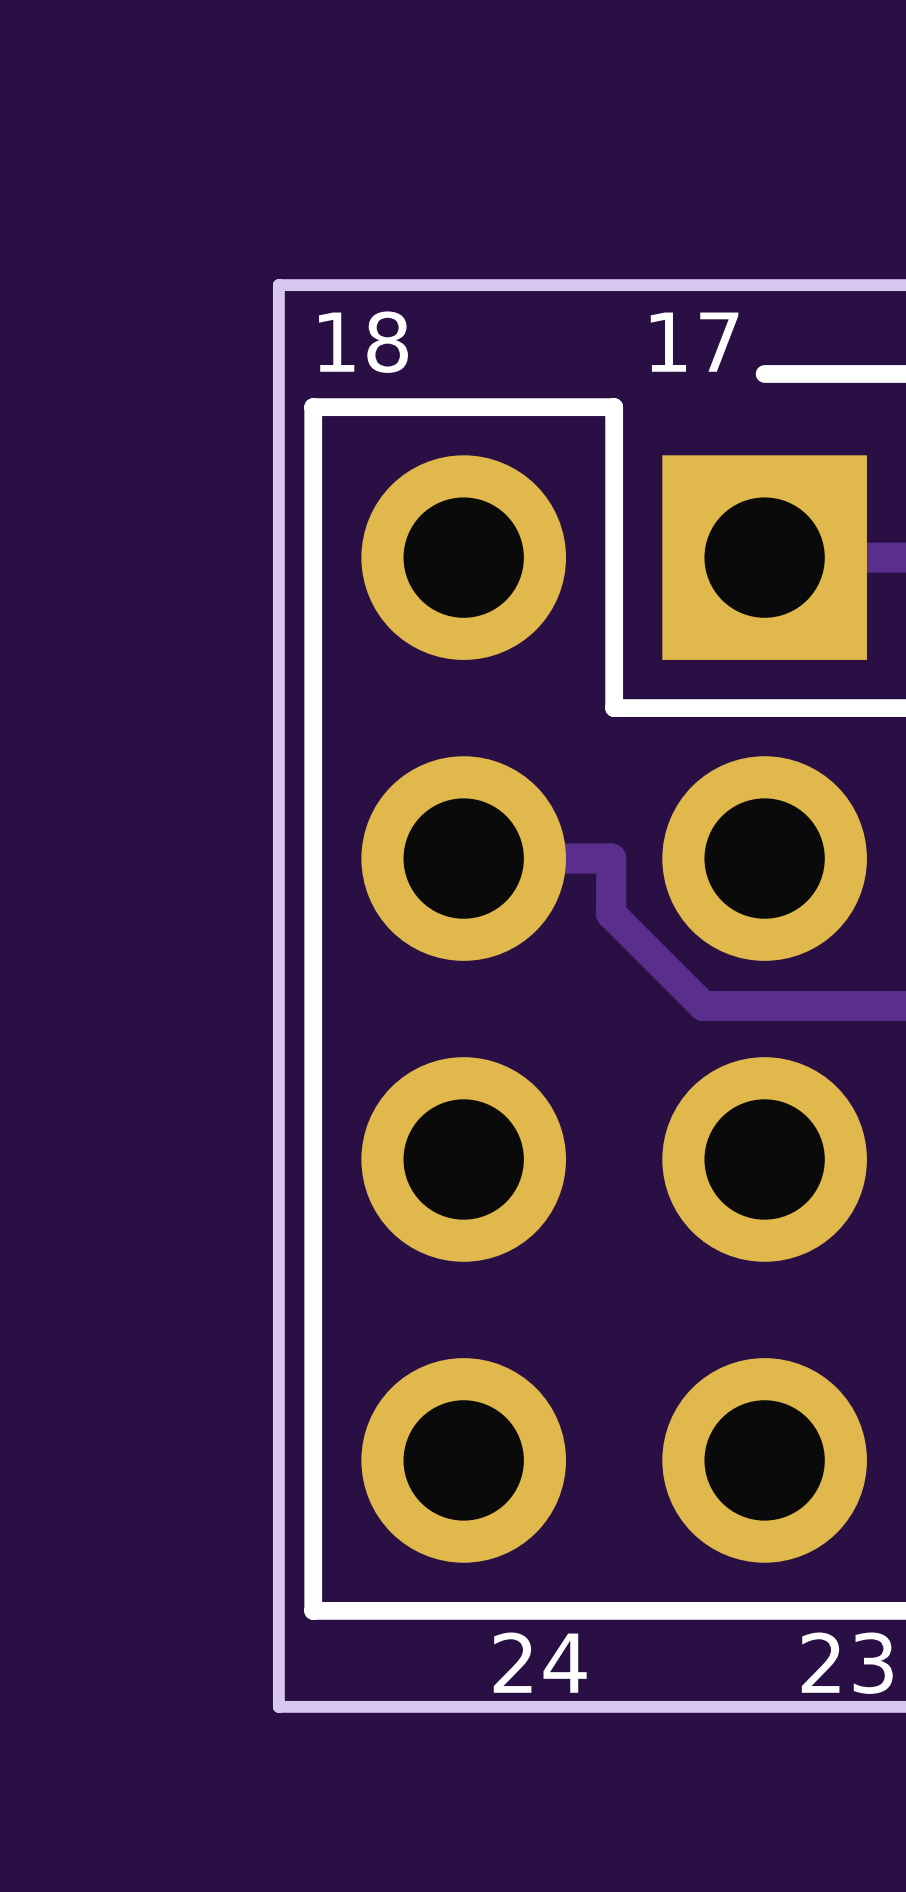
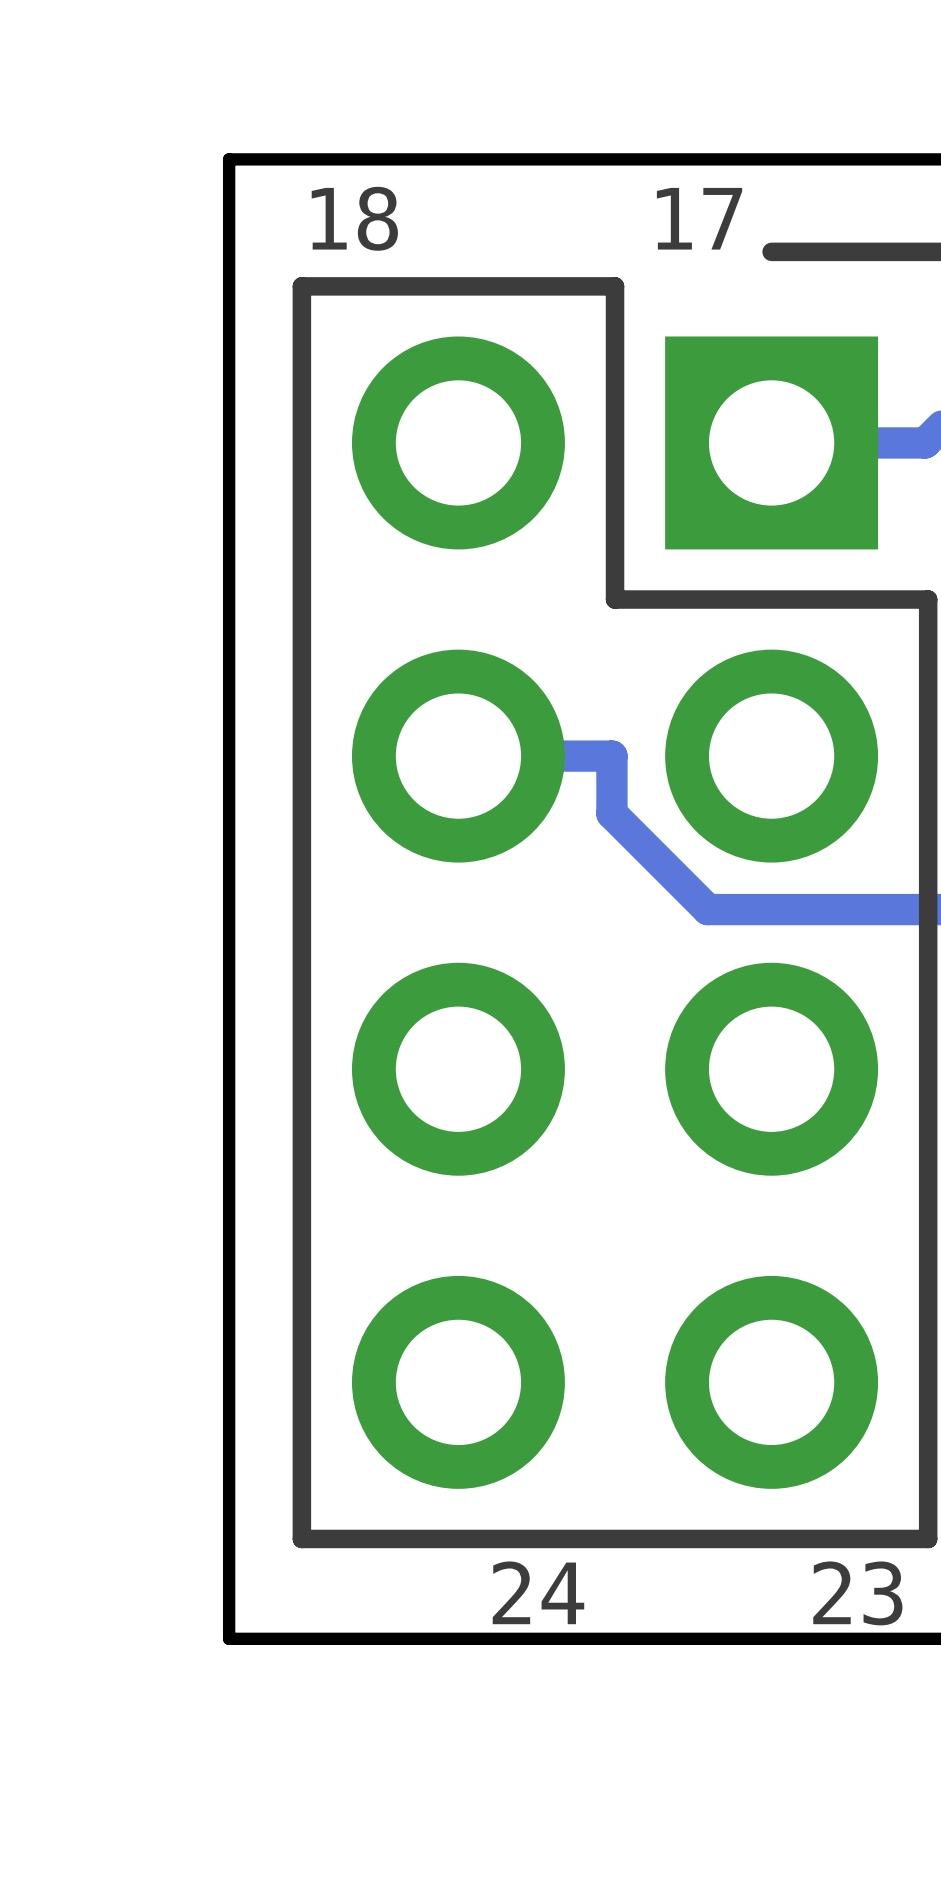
board edge: (278, 285) (278, 1706) -> (266, 159) (229, 159) (229, 1638) (266, 1638)

